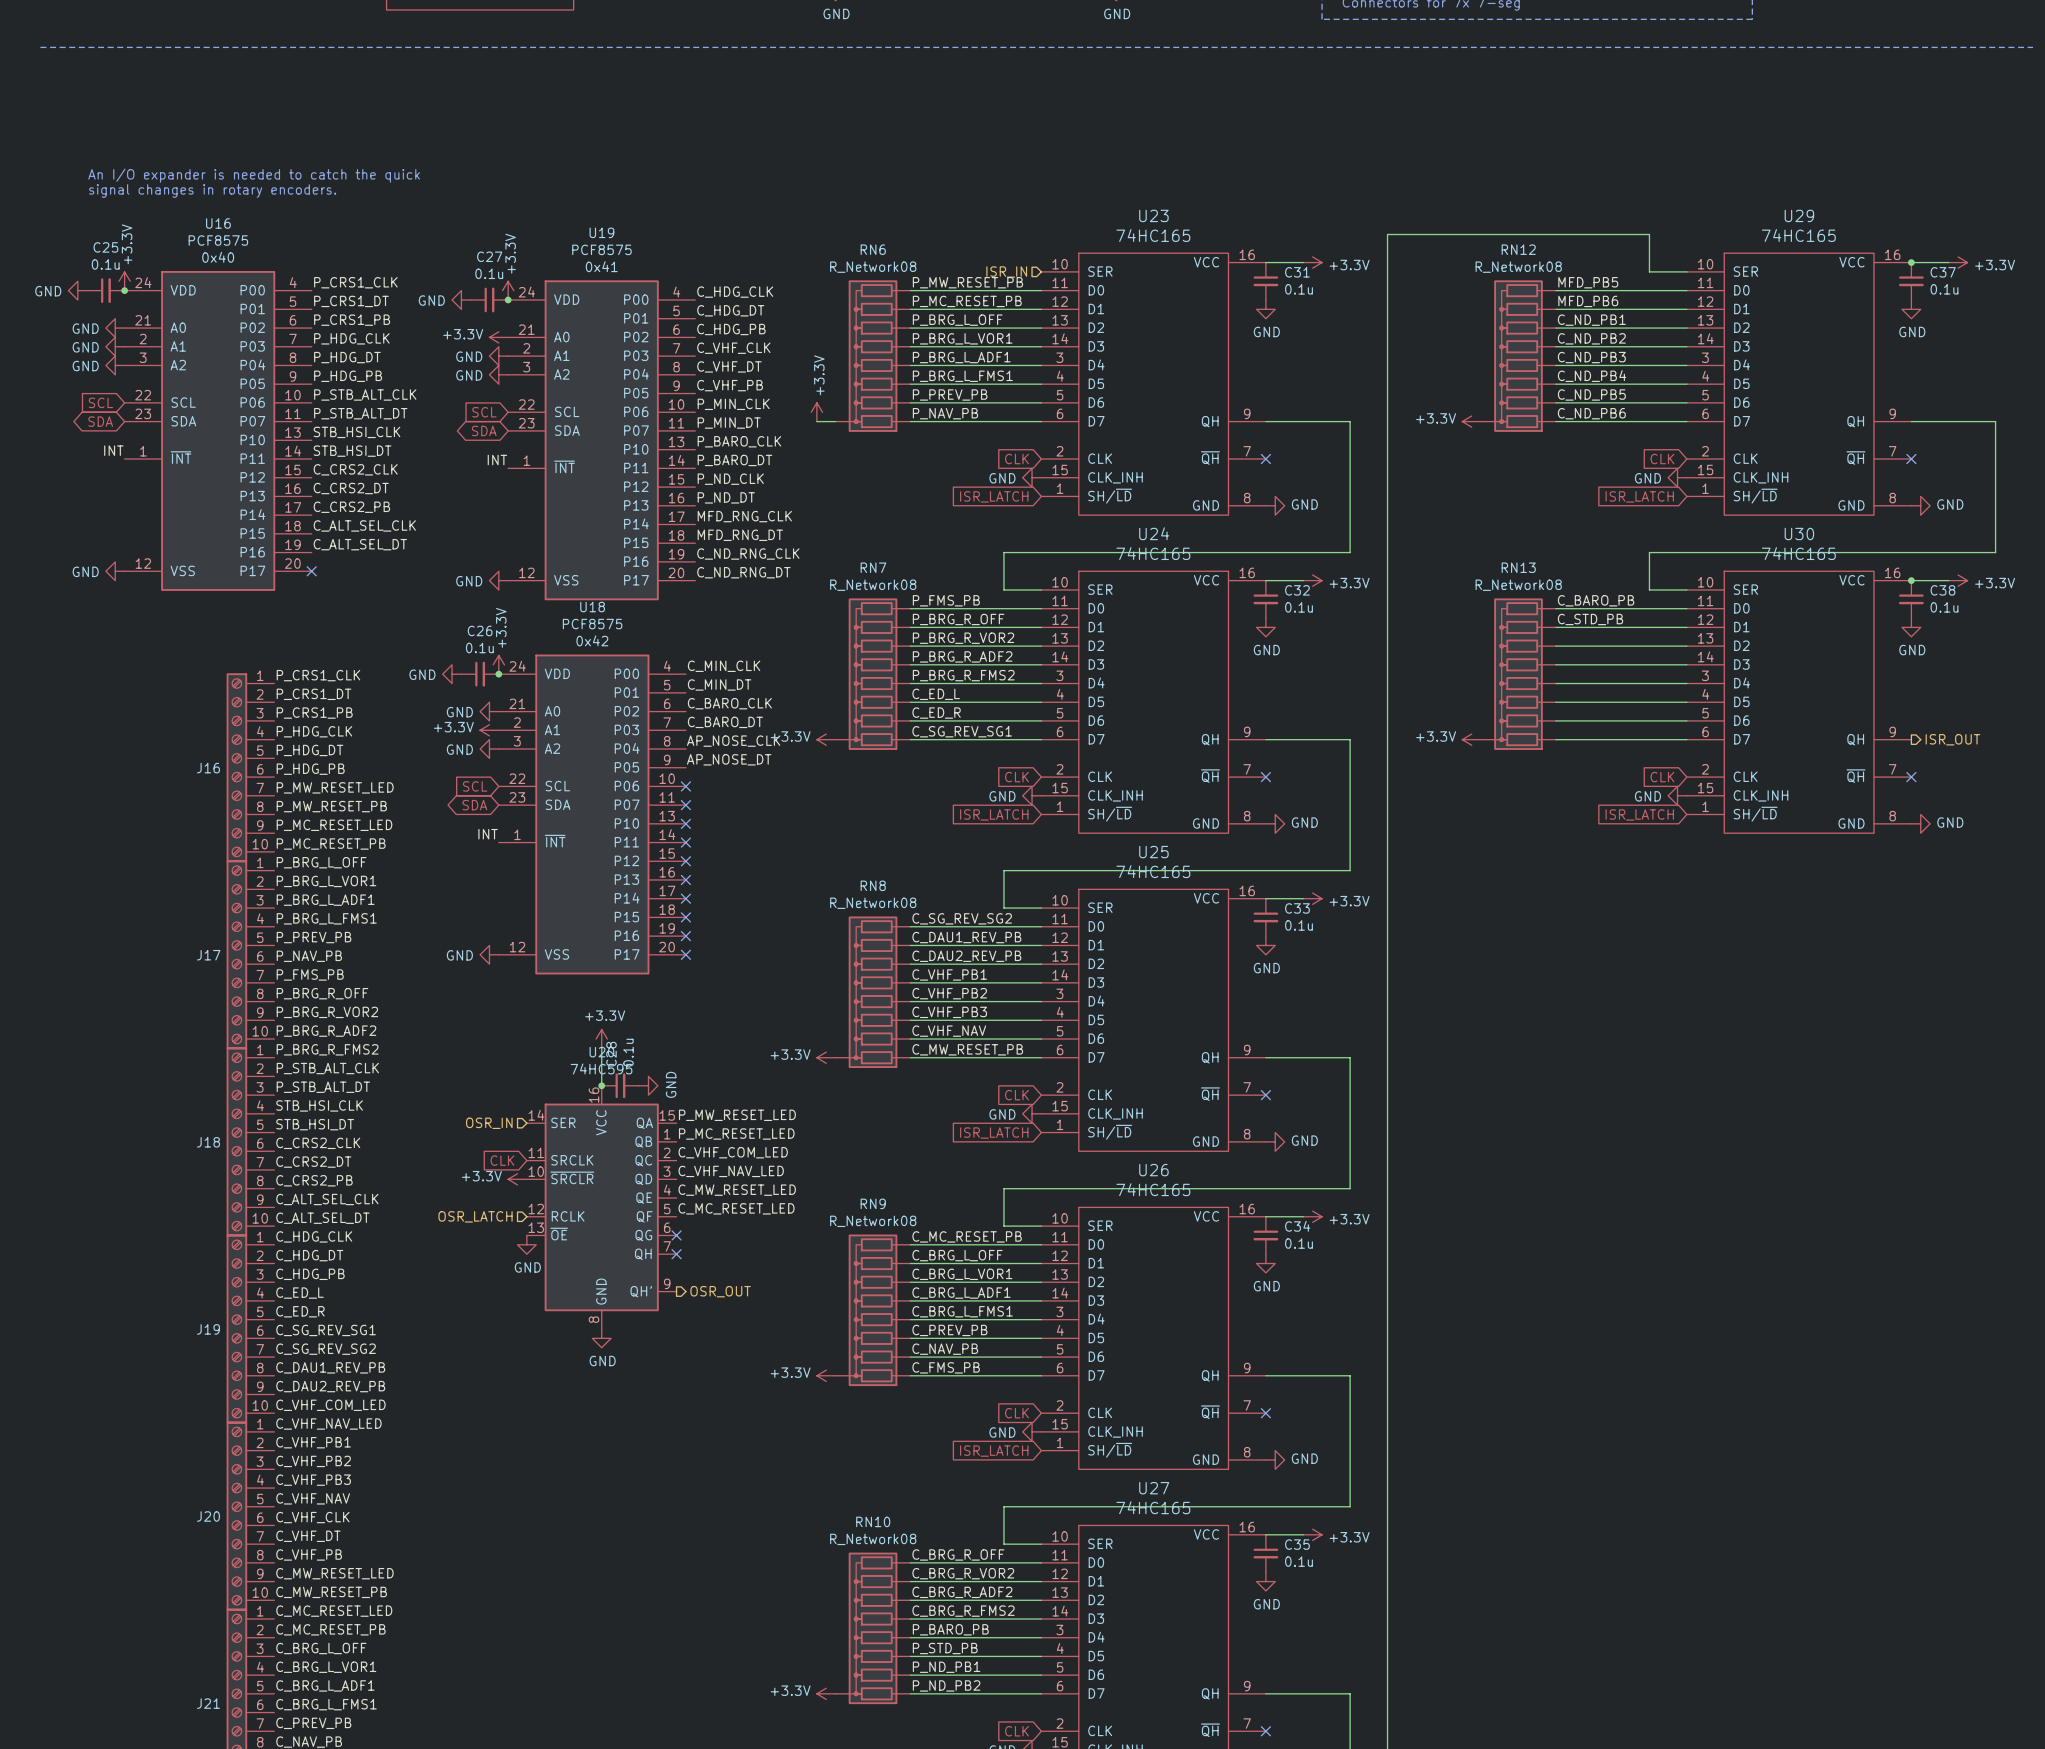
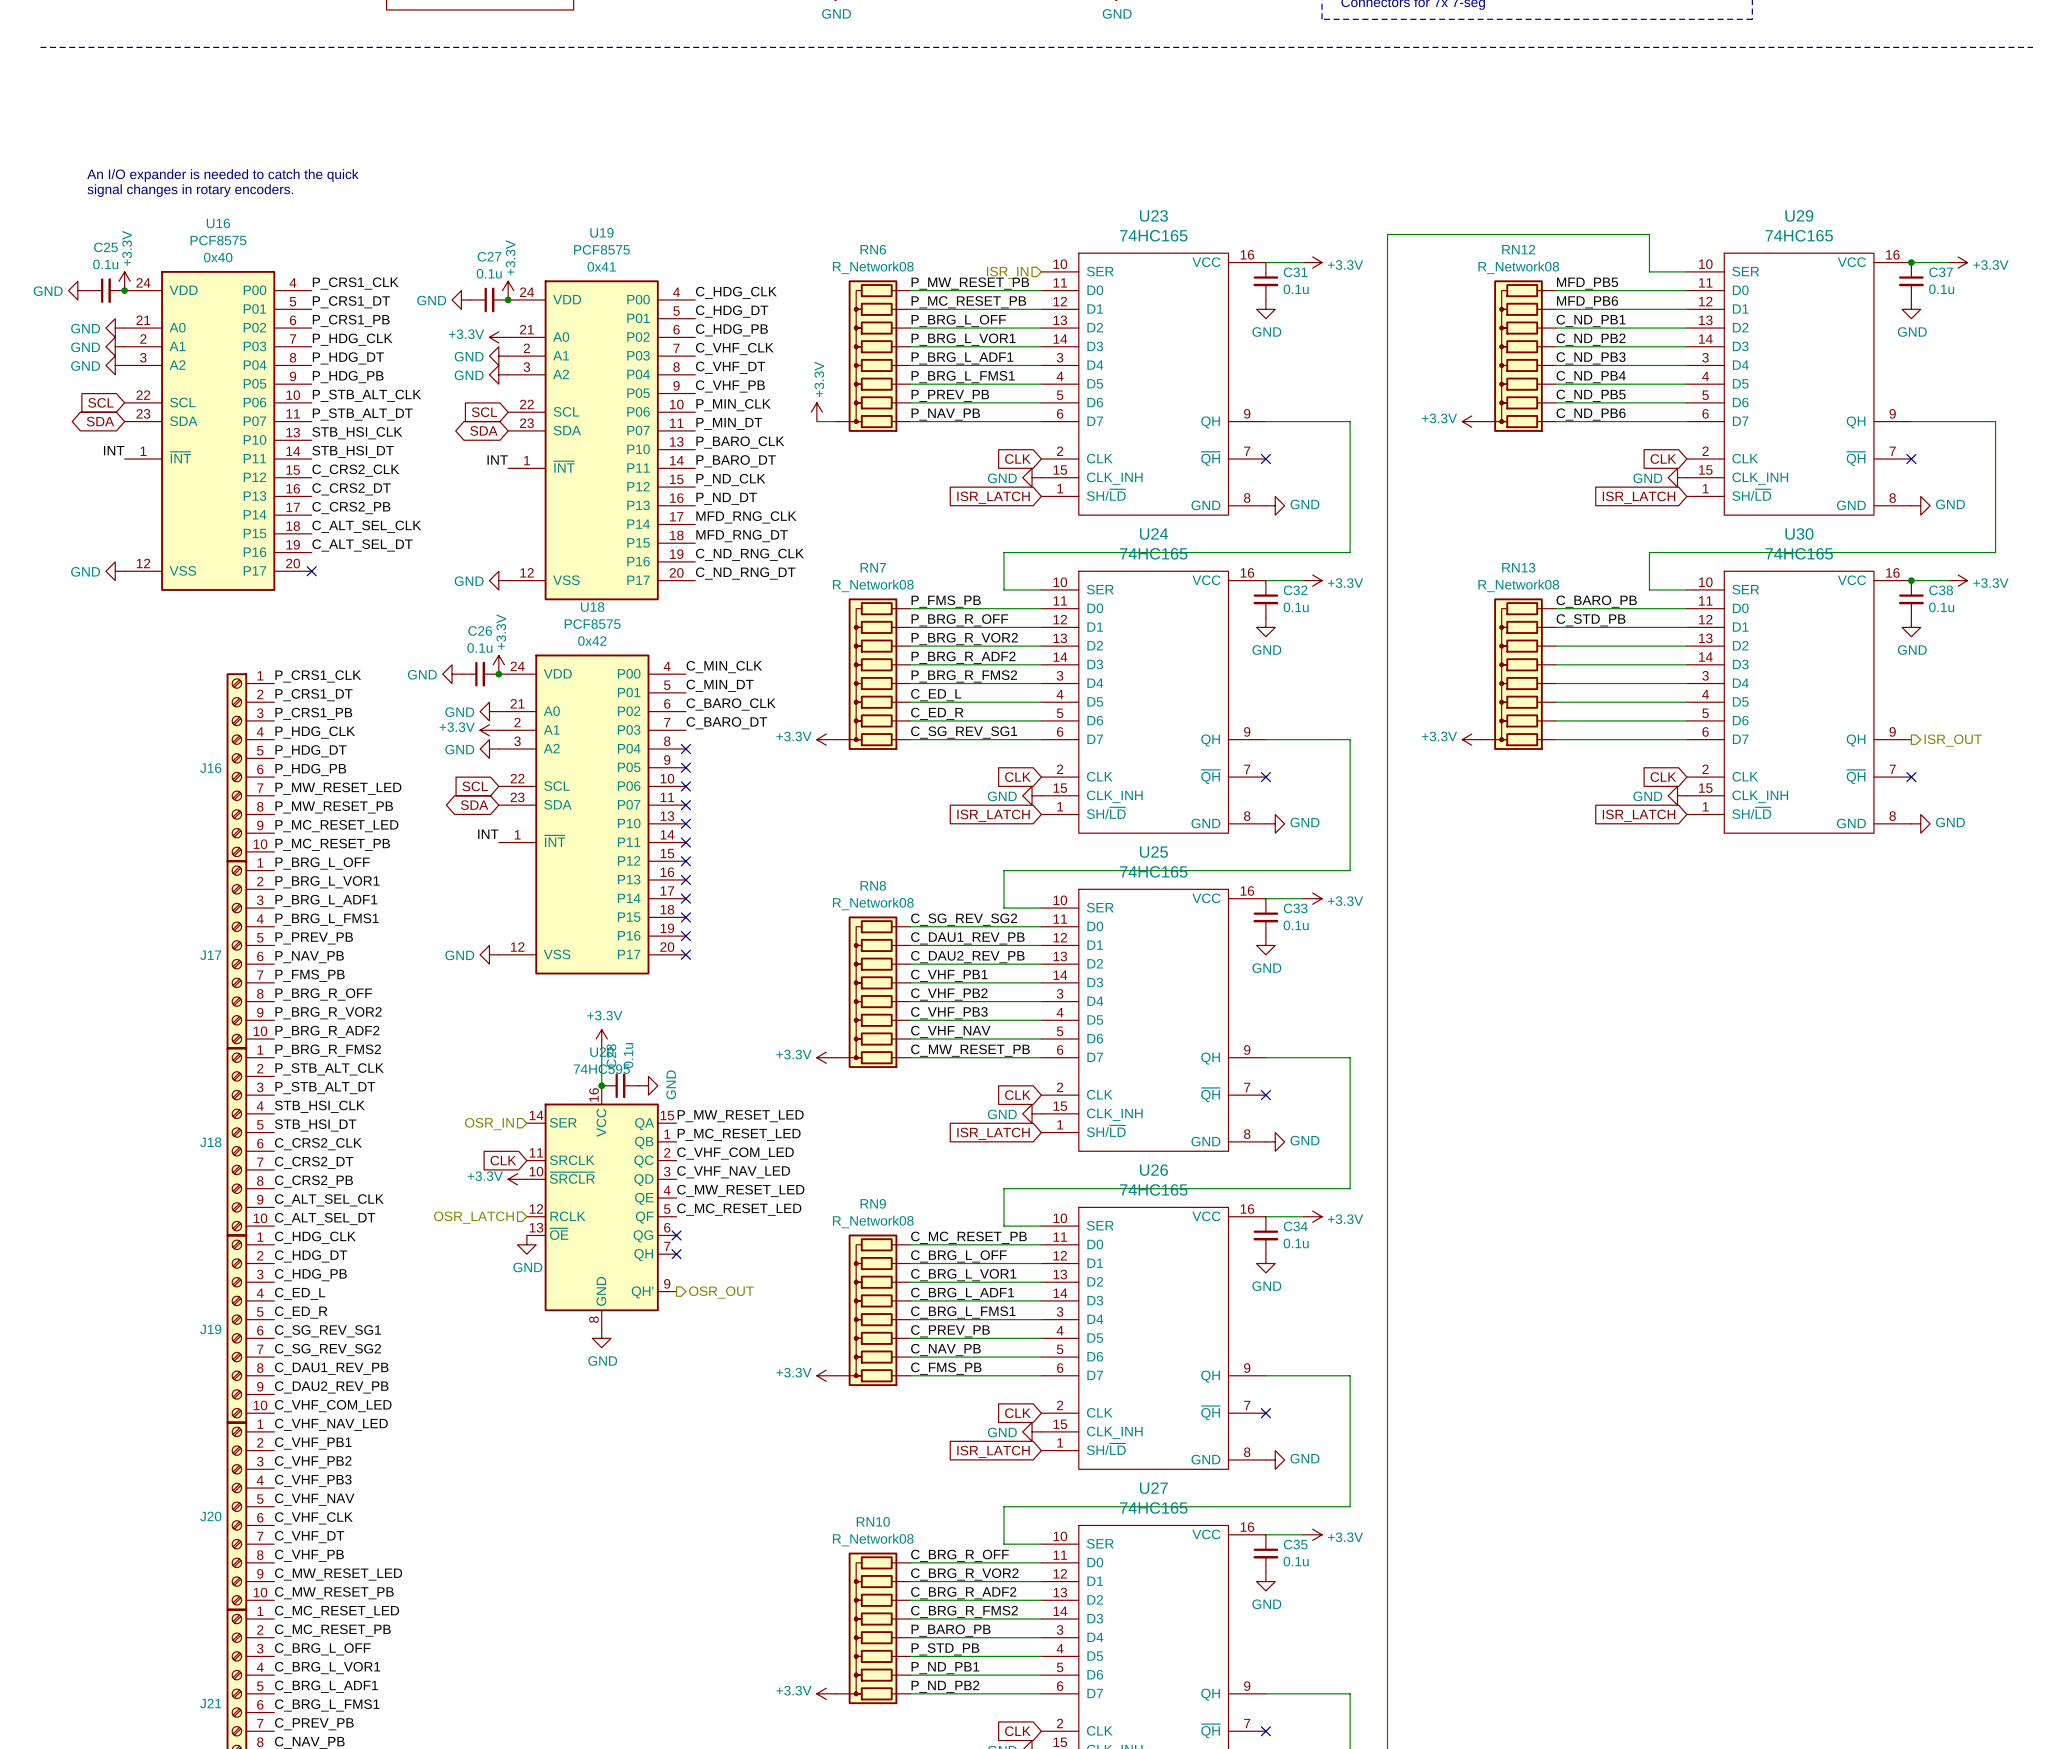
label: AP_NOSE_CLK (733, 741) -> none
no-connect mark: none -> (685, 749)
label: AP_NOSE_DT (729, 759) -> none
no-connect mark: none -> (685, 767)

